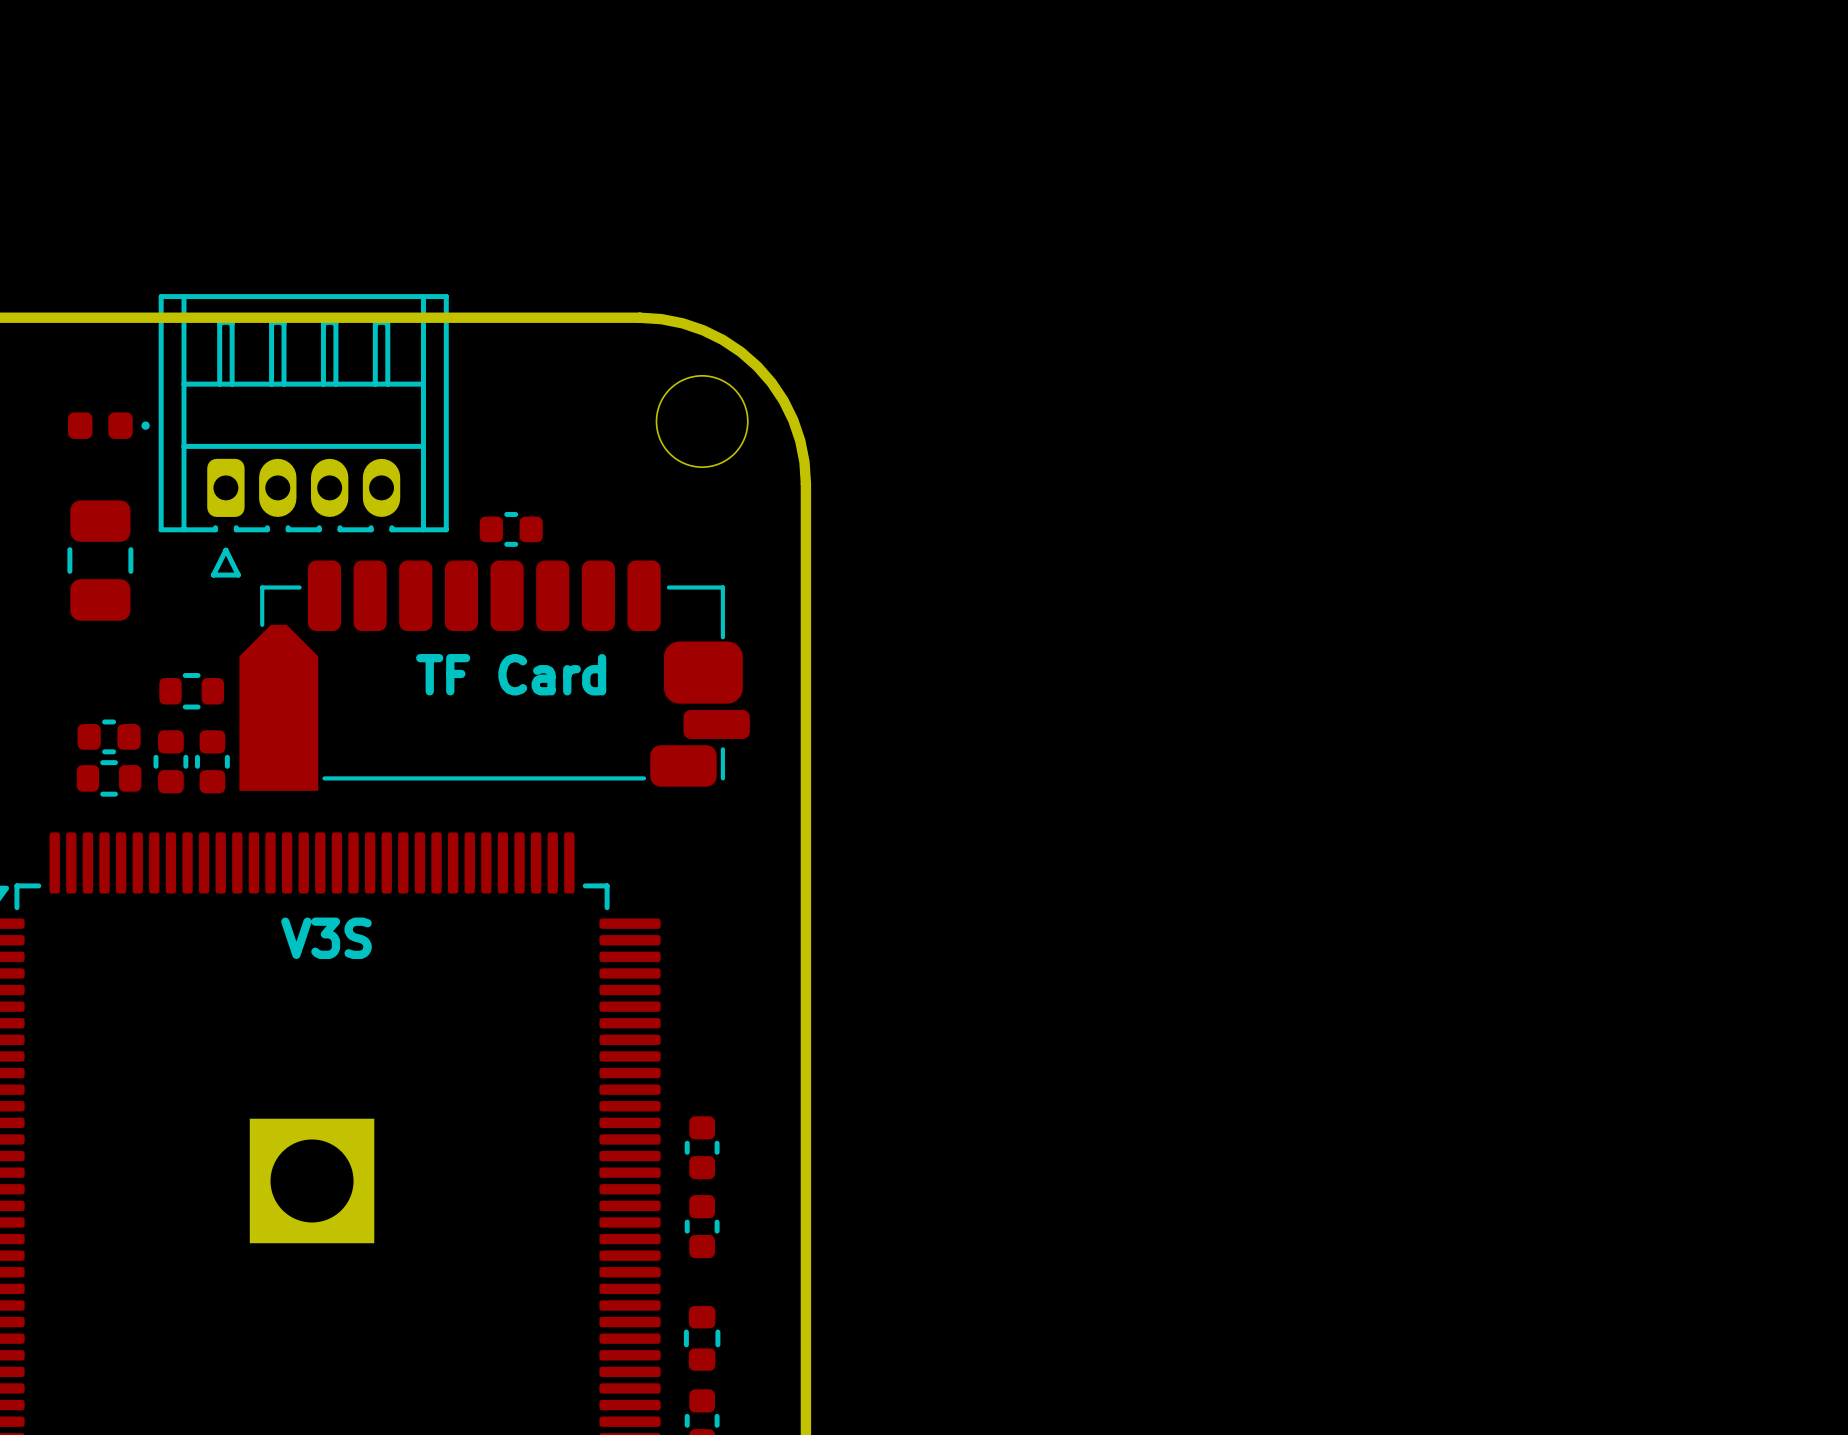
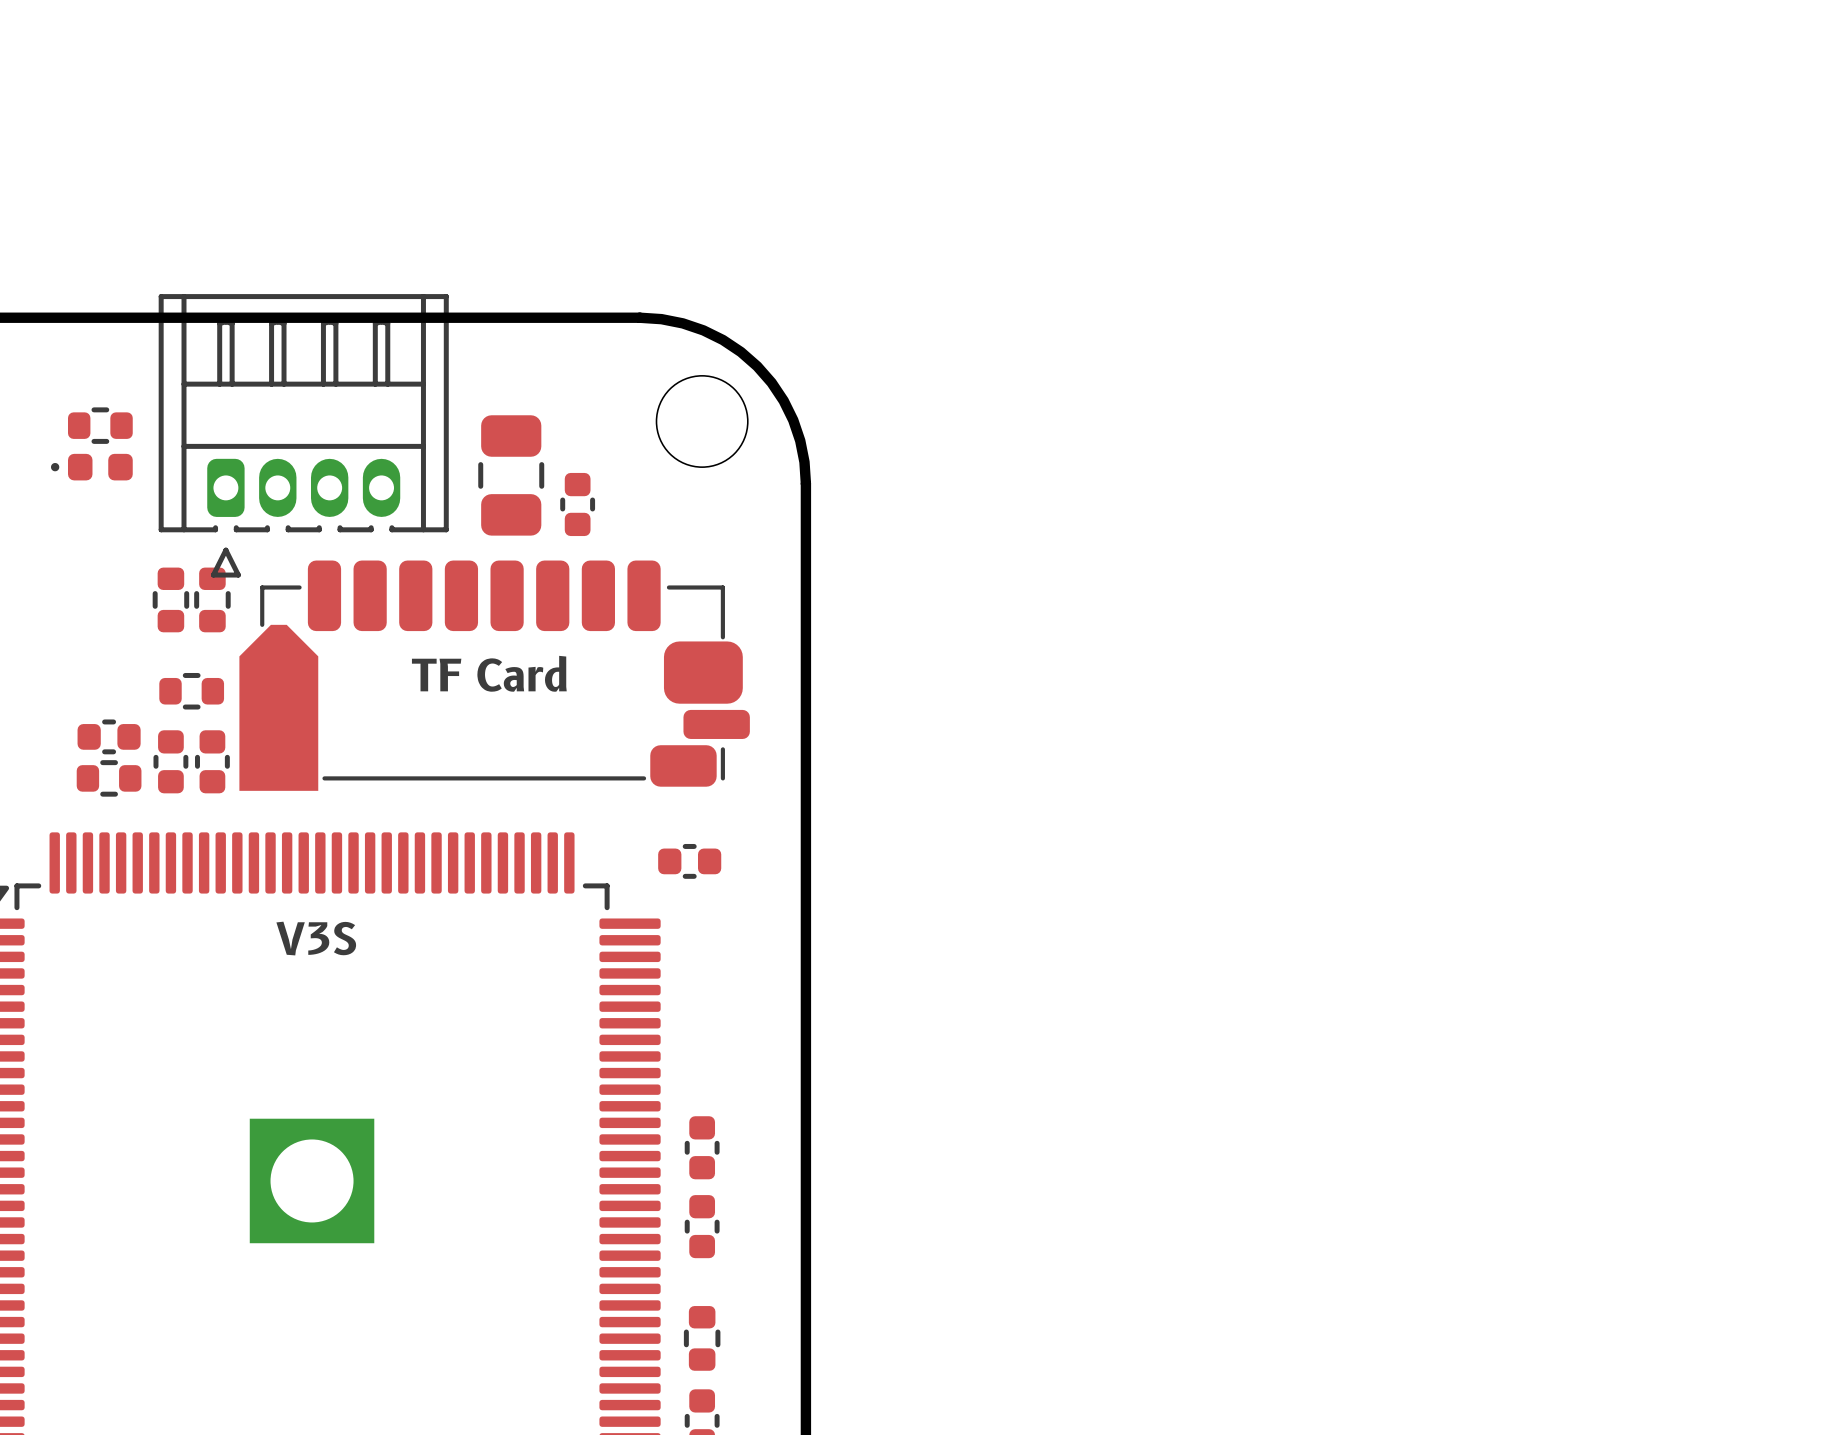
part footprint: [68, 412, 150, 439] -> [68, 407, 133, 444]
part: none -> (91, 467)
part rotation: 0° (511, 529) -> 90° clockwise (577, 504)
part position: (511, 529) -> (577, 504)
part position: (100, 560) -> (511, 475)
part: none -> (170, 599)
part: none -> (212, 599)
part: none -> (689, 861)

